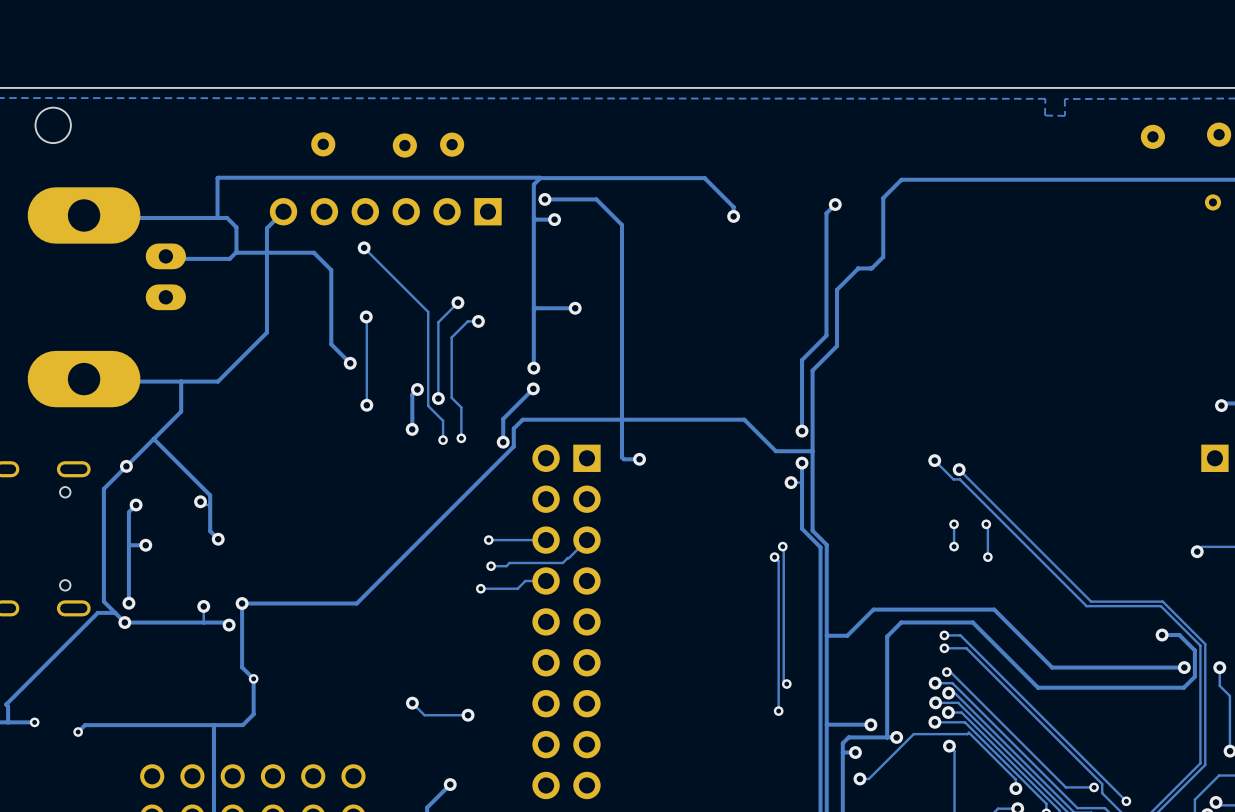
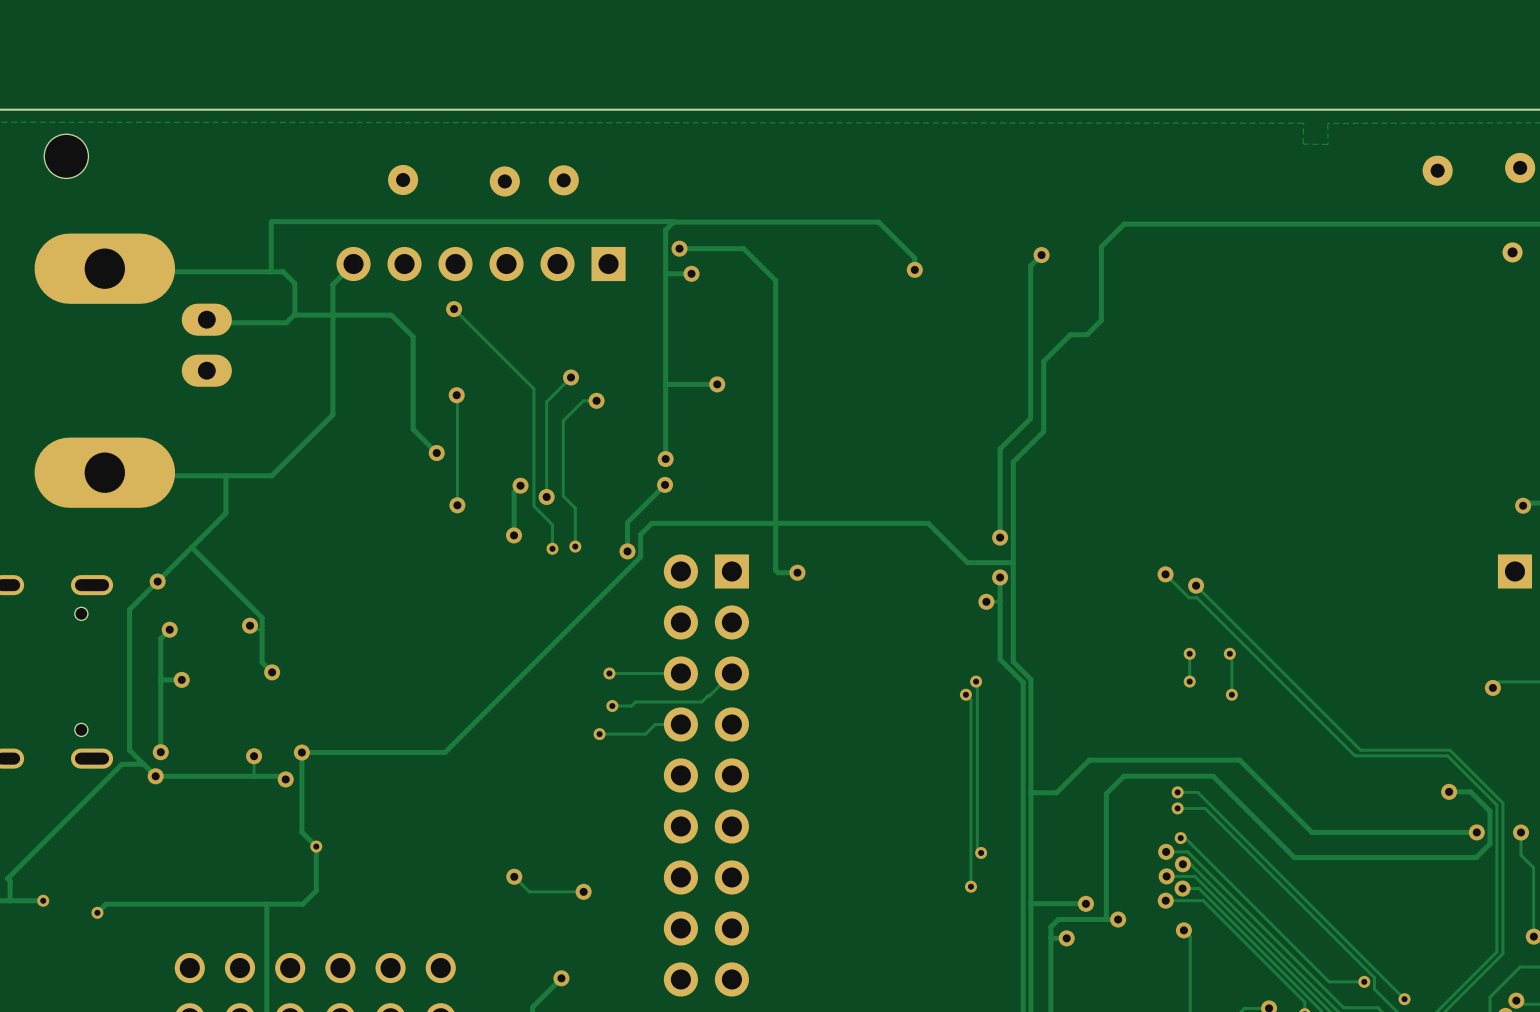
track: (859, 778) (868, 778) (913, 734) (968, 732) (1015, 779) (1015, 788) -> none
via: (859, 778) -> none
via: (1015, 788) -> none

